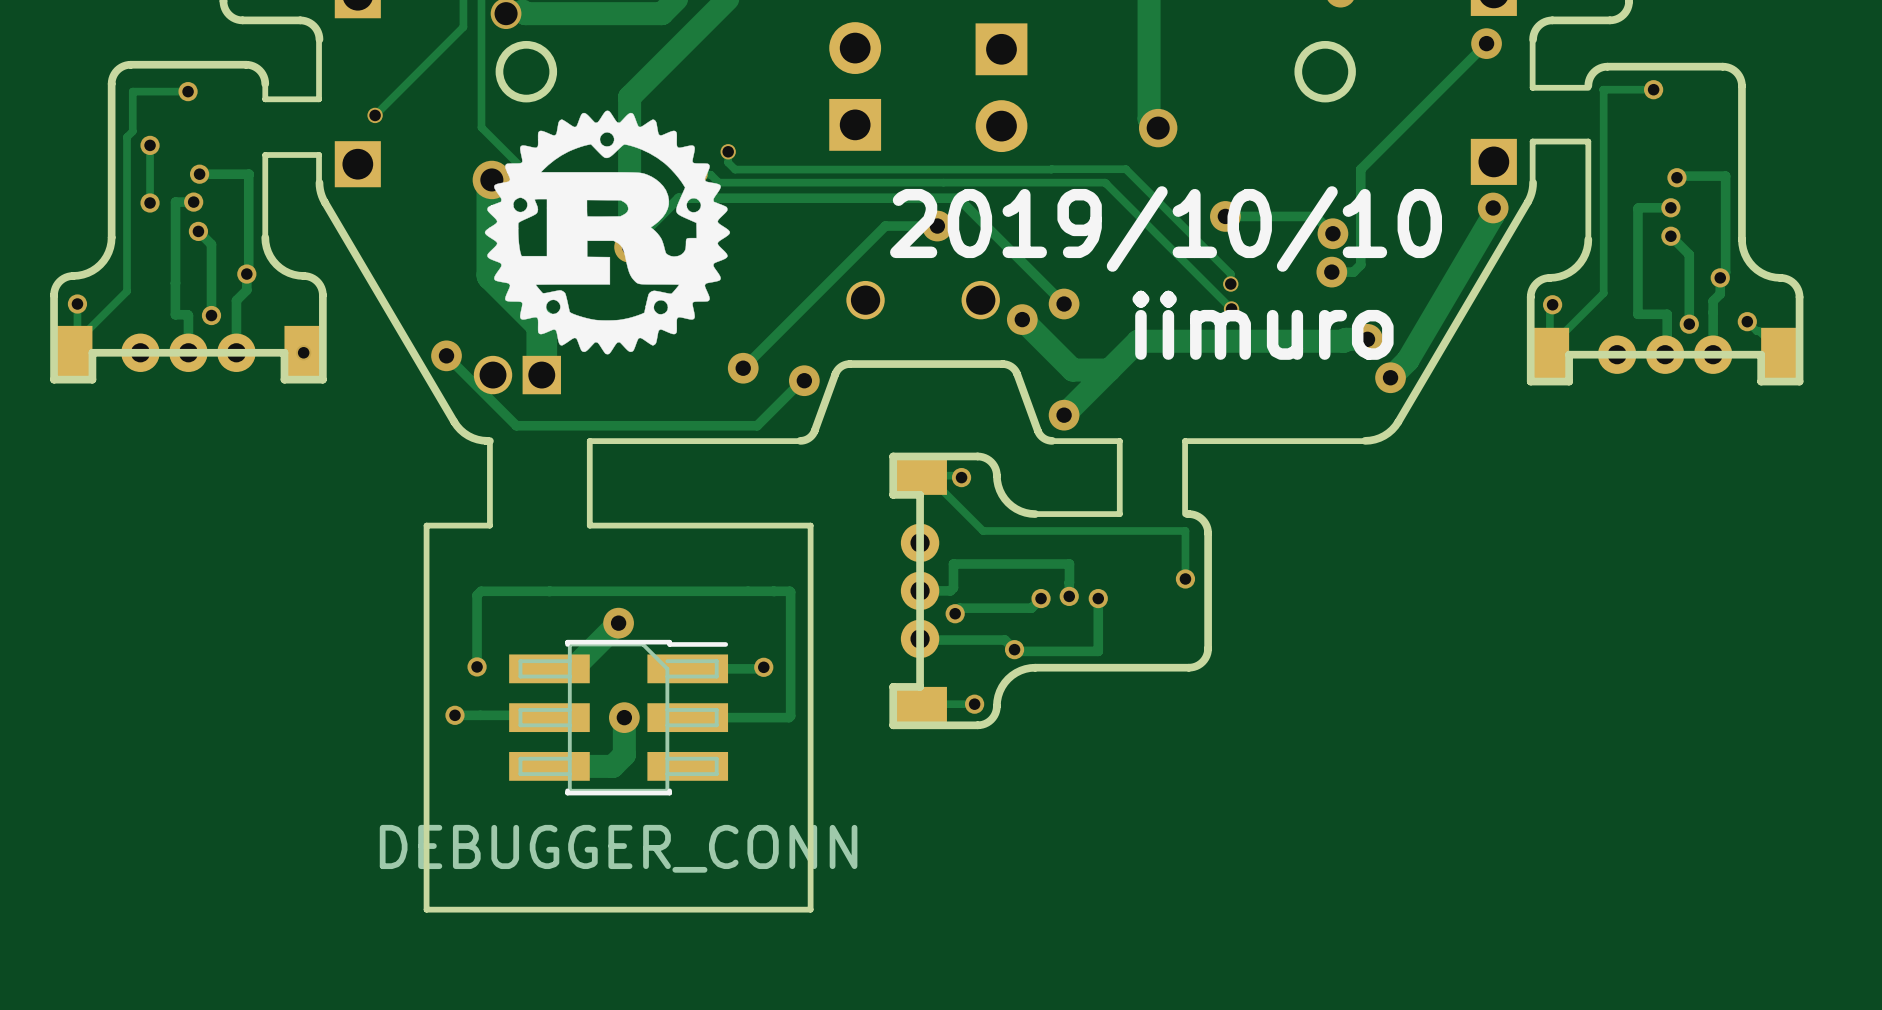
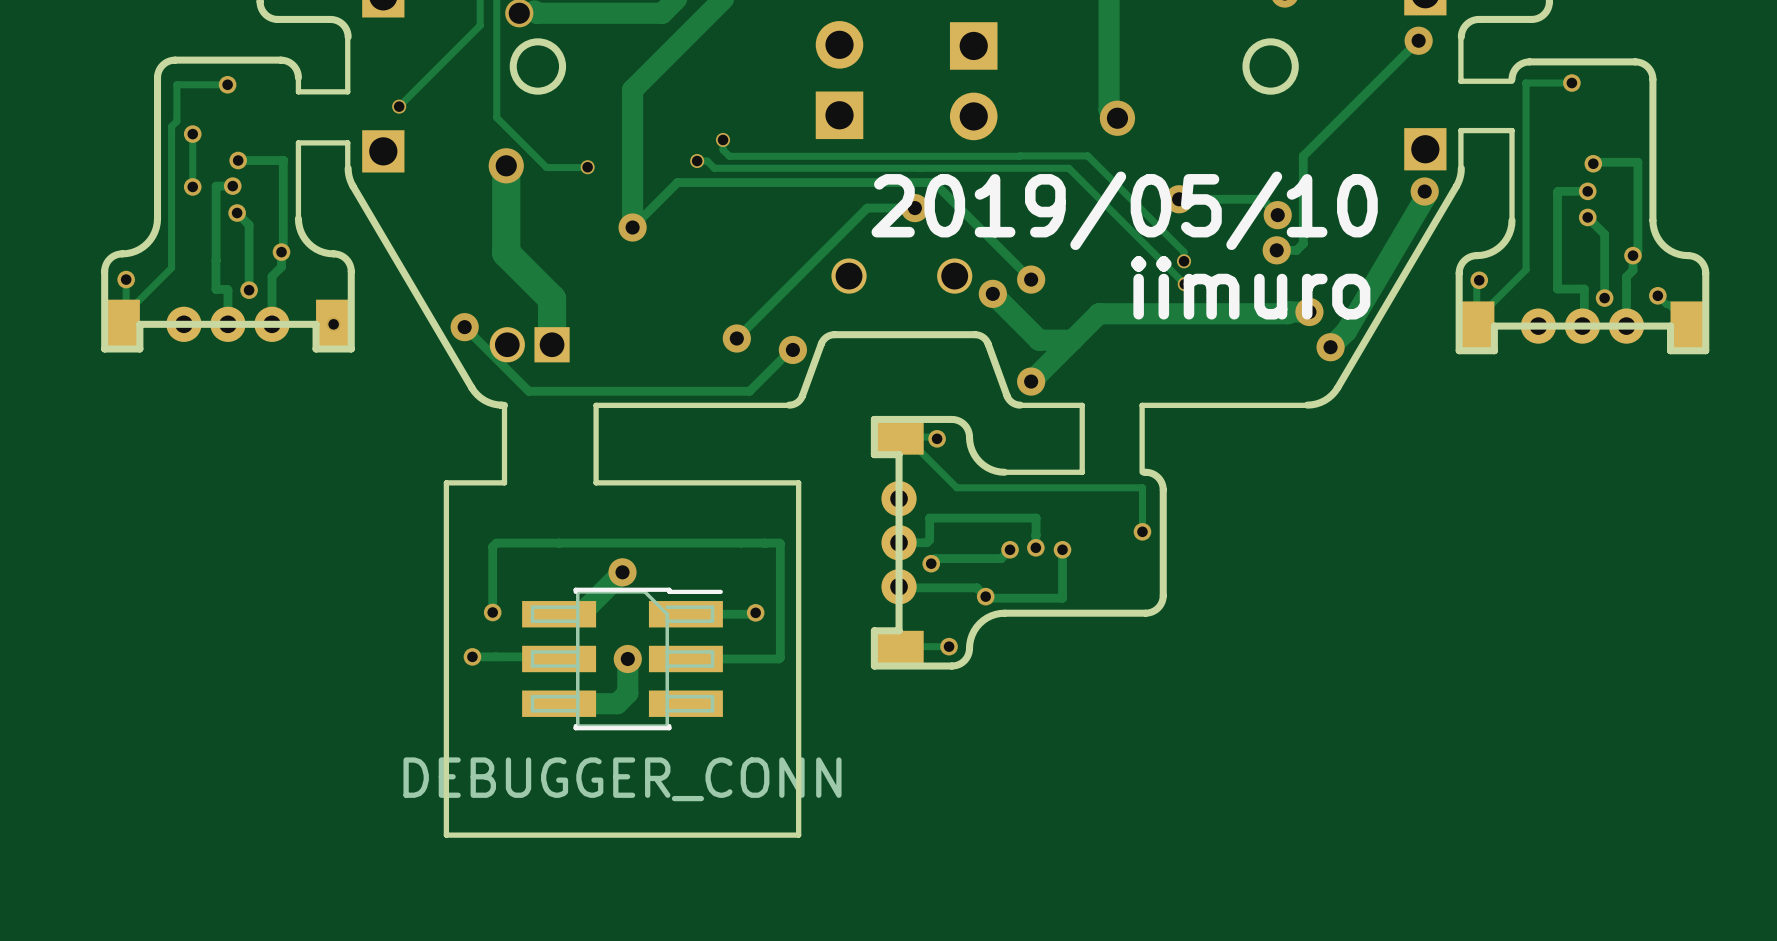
drawing: [484, 110, 731, 355] -> none
text: 2019/10/10 (1166, 228) -> 2019/05/10 (1124, 210)
text position: iimuro (1263, 325) -> iimuro (1250, 287)

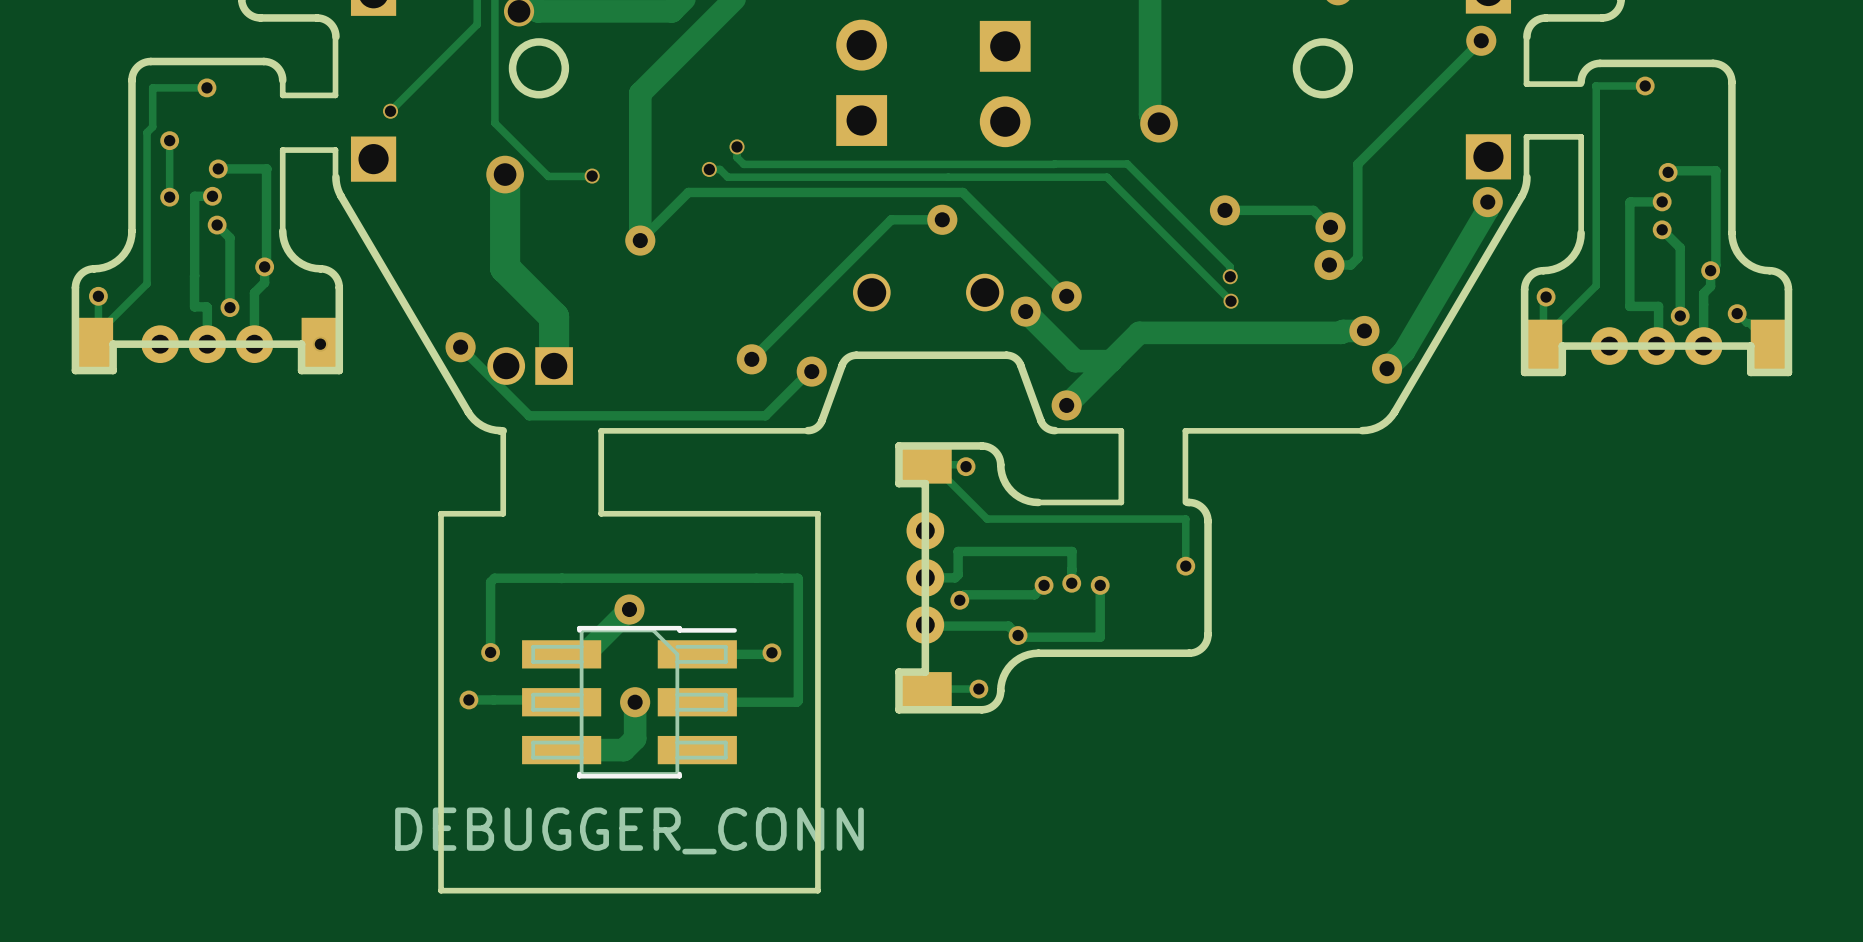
text: 2019/05/10 (1124, 210) -> none
text: iimuro (1250, 287) -> none

